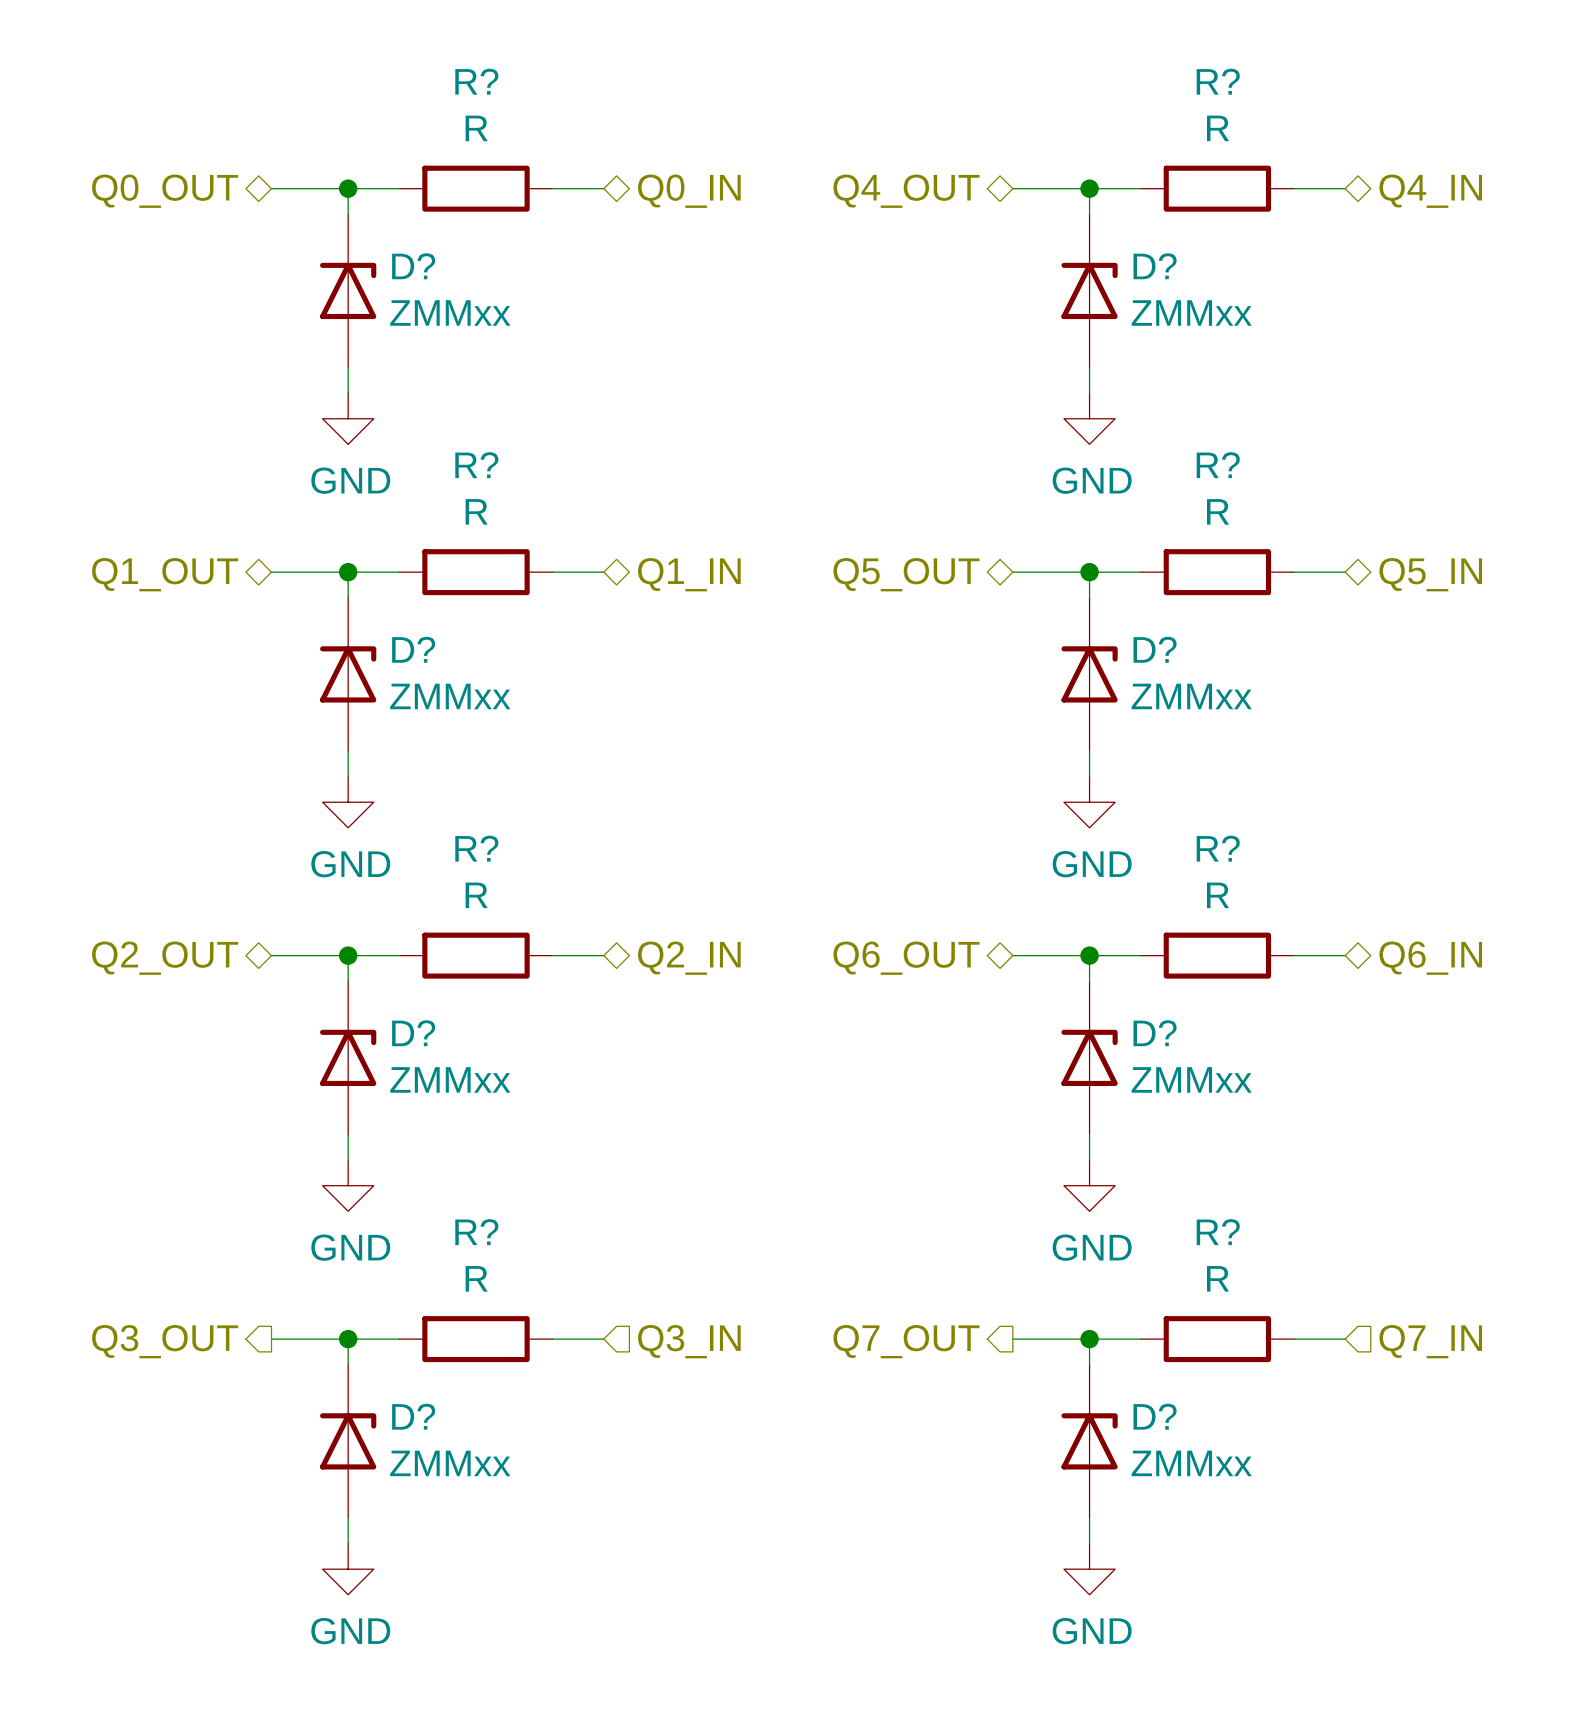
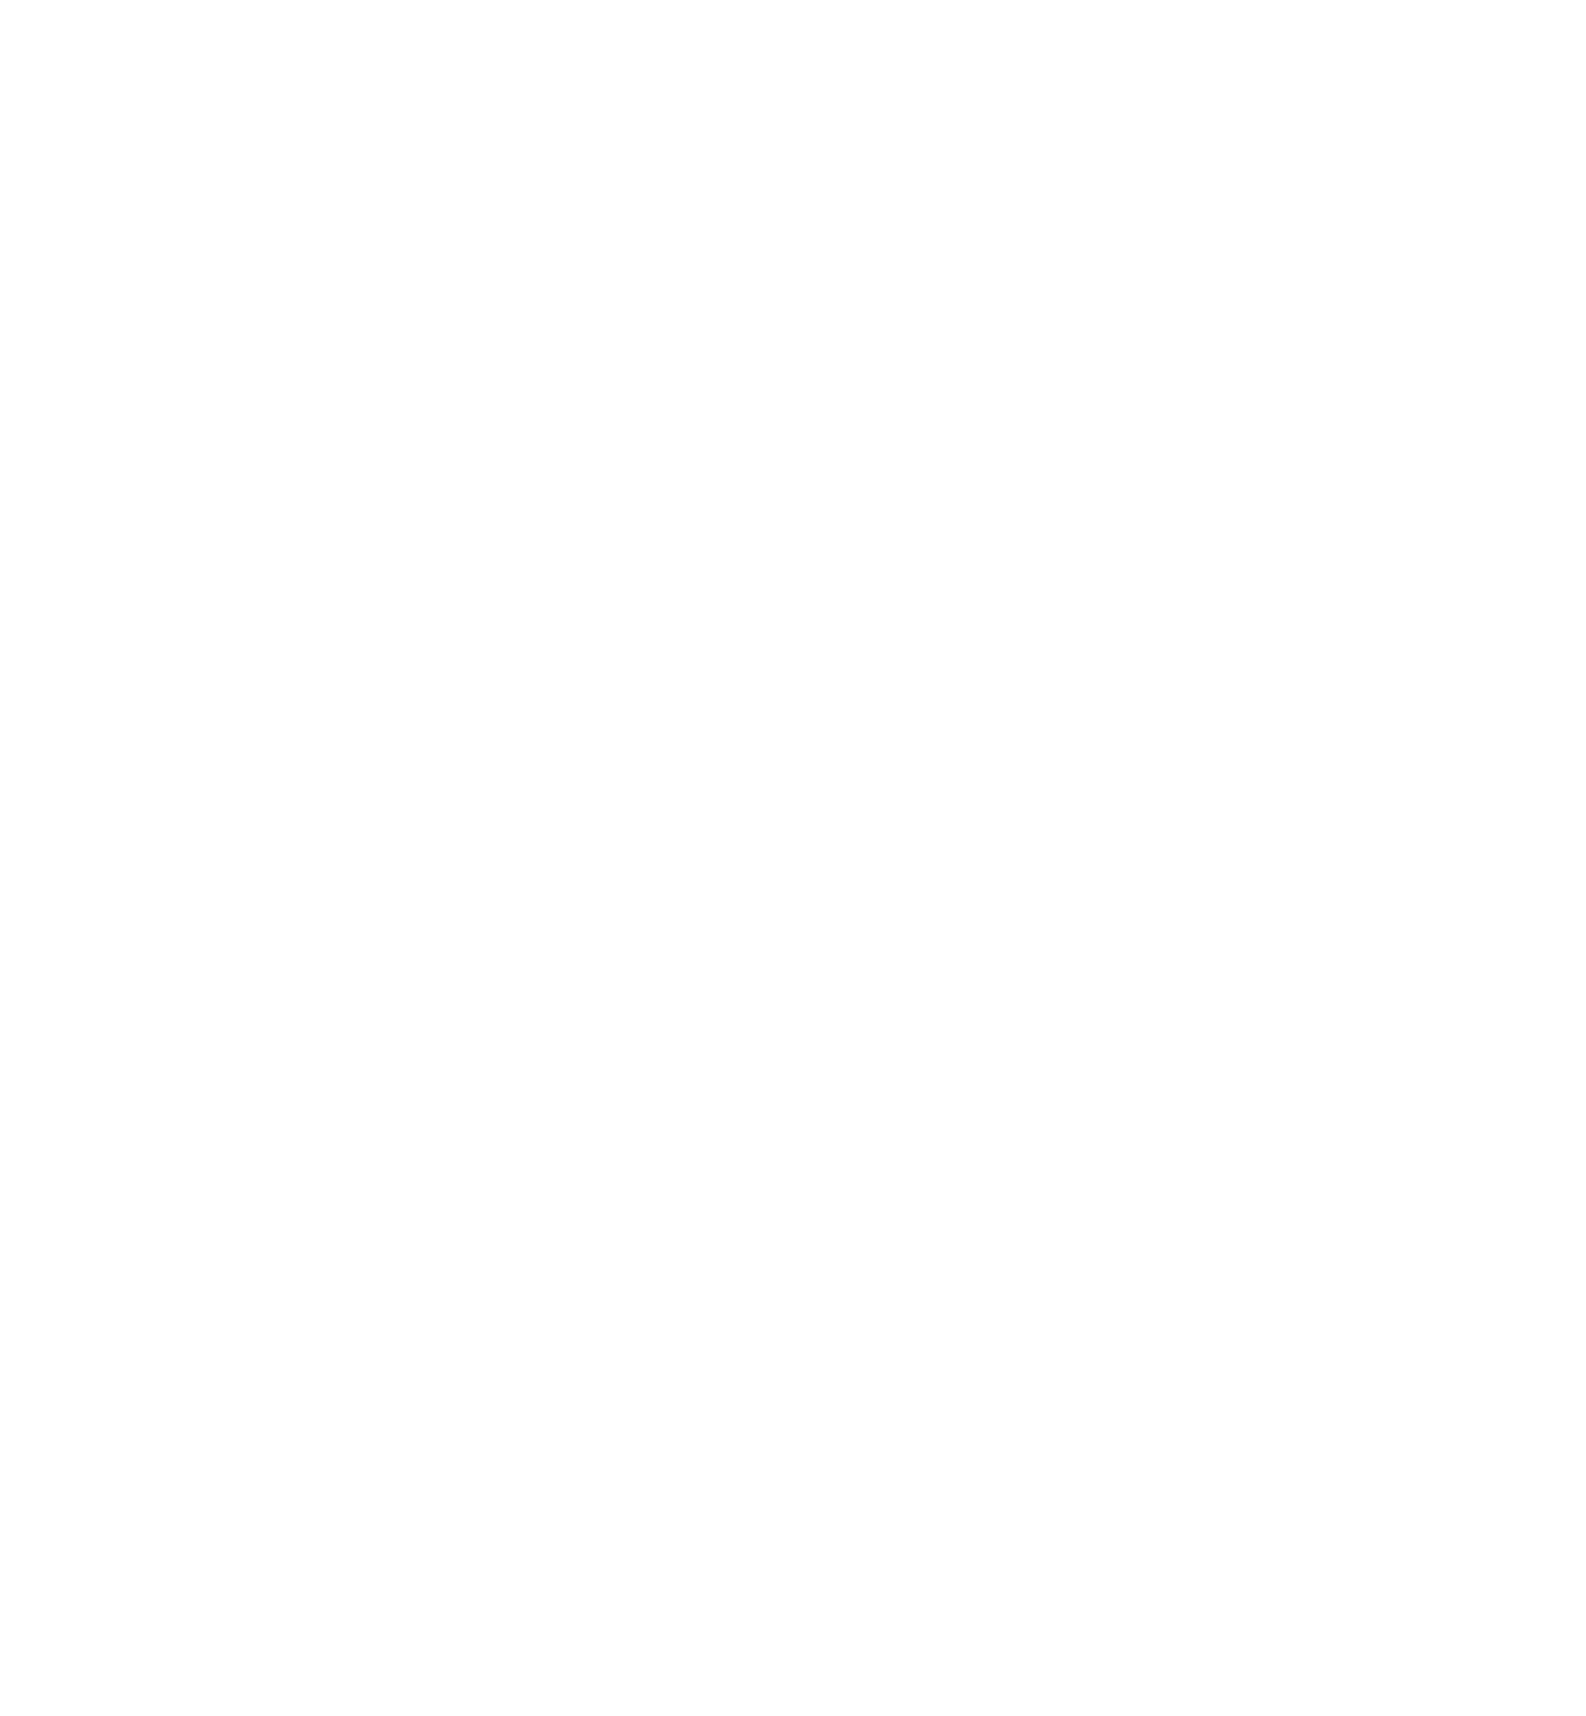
wire: (271, 188) (399, 188) -> none
wire: (348, 188) (348, 214) -> none
junction: (348, 188) -> none
R?: R (475, 188) -> none
wire: (552, 188) (603, 188) -> none
wire: (1012, 188) (1140, 188) -> none
wire: (1089, 188) (1089, 214) -> none
junction: (1089, 188) -> none
R?: R (1217, 188) -> none
wire: (1294, 188) (1345, 188) -> none
hierarchical label: Q0_OUT (165, 191) -> none
hierarchical label: Q0_IN (689, 191) -> none
hierarchical label: Q4_OUT (906, 191) -> none
hierarchical label: Q4_IN (1430, 191) -> none
D?: ZMMxx (348, 290) -> none
D?: ZMMxx (1089, 290) -> none
wire: (348, 367) (348, 393) -> none
wire: (1089, 367) (1089, 393) -> none
power symbol: GND (348, 418) -> none
power symbol: GND (1089, 418) -> none
wire: (271, 572) (399, 572) -> none
wire: (348, 572) (348, 597) -> none
junction: (348, 572) -> none
R?: R (475, 572) -> none
wire: (552, 572) (603, 572) -> none
wire: (1012, 572) (1140, 572) -> none
wire: (1089, 572) (1089, 597) -> none
junction: (1089, 572) -> none
R?: R (1217, 572) -> none
wire: (1294, 572) (1345, 572) -> none
hierarchical label: Q1_OUT (165, 574) -> none
hierarchical label: Q1_IN (689, 574) -> none
hierarchical label: Q5_OUT (906, 574) -> none
hierarchical label: Q5_IN (1430, 574) -> none
D?: ZMMxx (348, 674) -> none
D?: ZMMxx (1089, 674) -> none
wire: (348, 751) (348, 776) -> none
wire: (1089, 751) (1089, 776) -> none
power symbol: GND (348, 802) -> none
power symbol: GND (1089, 802) -> none
wire: (271, 955) (399, 955) -> none
wire: (348, 955) (348, 981) -> none
junction: (348, 955) -> none
R?: R (475, 955) -> none
wire: (552, 955) (603, 955) -> none
wire: (1012, 955) (1140, 955) -> none
wire: (1089, 955) (1089, 981) -> none
junction: (1089, 955) -> none
R?: R (1217, 955) -> none
wire: (1294, 955) (1345, 955) -> none
hierarchical label: Q2_OUT (165, 958) -> none
hierarchical label: Q2_IN (689, 958) -> none
hierarchical label: Q6_OUT (906, 958) -> none
hierarchical label: Q6_IN (1430, 958) -> none
D?: ZMMxx (348, 1057) -> none
D?: ZMMxx (1089, 1057) -> none
wire: (348, 1134) (348, 1160) -> none
wire: (1089, 1134) (1089, 1160) -> none
power symbol: GND (348, 1185) -> none
power symbol: GND (1089, 1185) -> none
wire: (271, 1339) (399, 1339) -> none
wire: (348, 1339) (348, 1364) -> none
junction: (348, 1339) -> none
R?: R (475, 1339) -> none
wire: (552, 1339) (603, 1339) -> none
wire: (1012, 1339) (1140, 1339) -> none
wire: (1089, 1339) (1089, 1364) -> none
junction: (1089, 1339) -> none
R?: R (1217, 1339) -> none
wire: (1294, 1339) (1345, 1339) -> none
hierarchical label: Q3_OUT (165, 1341) -> none
hierarchical label: Q3_IN (689, 1341) -> none
hierarchical label: Q7_OUT (906, 1341) -> none
hierarchical label: Q7_IN (1430, 1341) -> none
D?: ZMMxx (348, 1441) -> none
D?: ZMMxx (1089, 1441) -> none
wire: (348, 1518) (348, 1543) -> none
wire: (1089, 1518) (1089, 1543) -> none
power symbol: GND (348, 1569) -> none
power symbol: GND (1089, 1569) -> none

